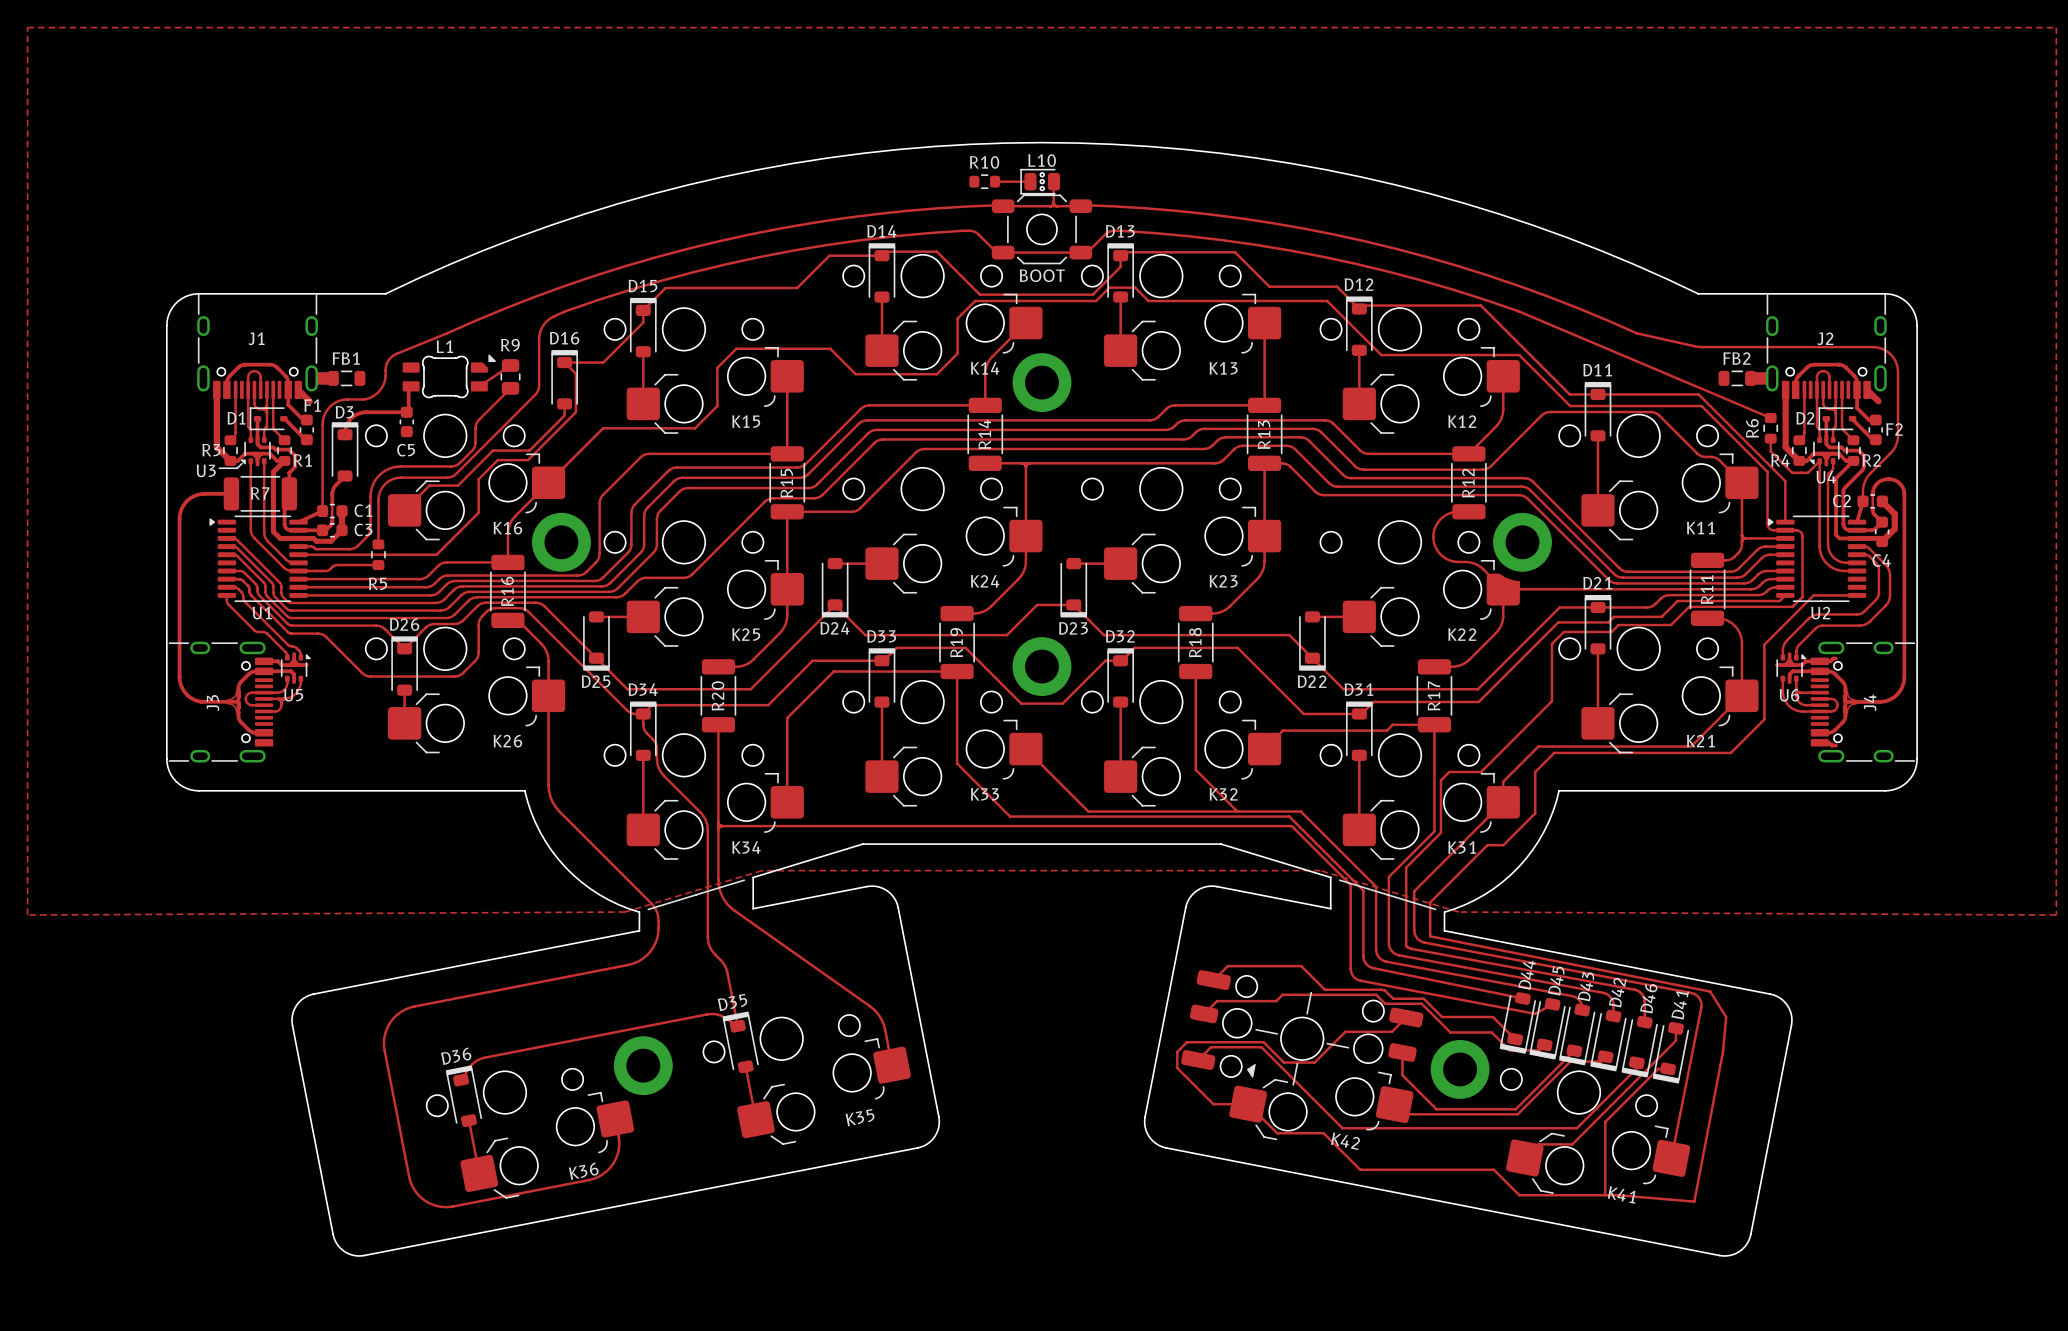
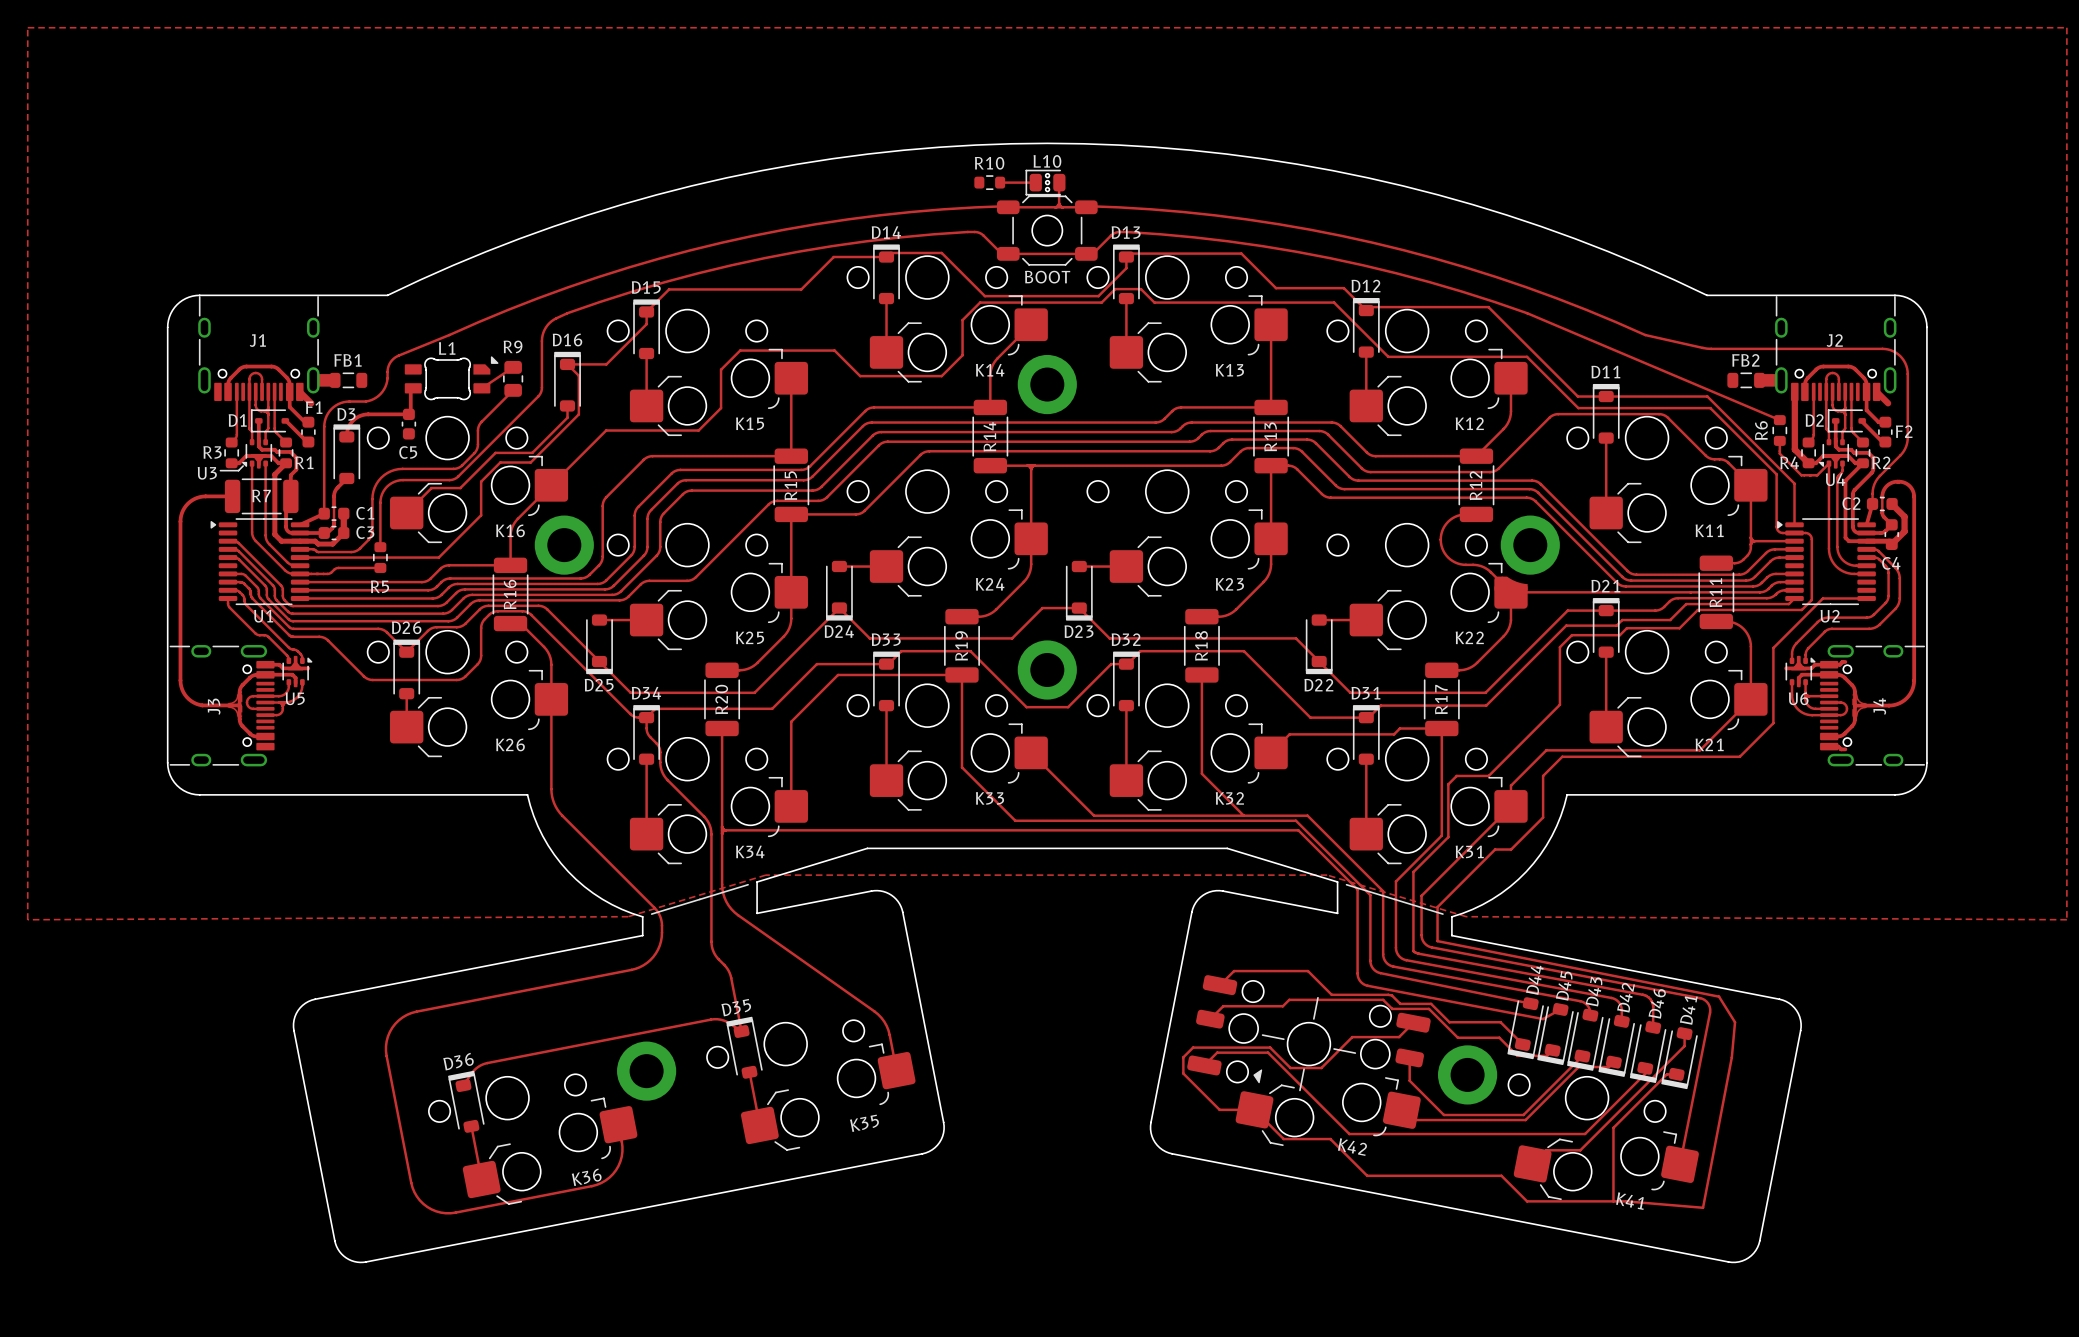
track: (216, 389) (216, 447) (230, 460) -> none

